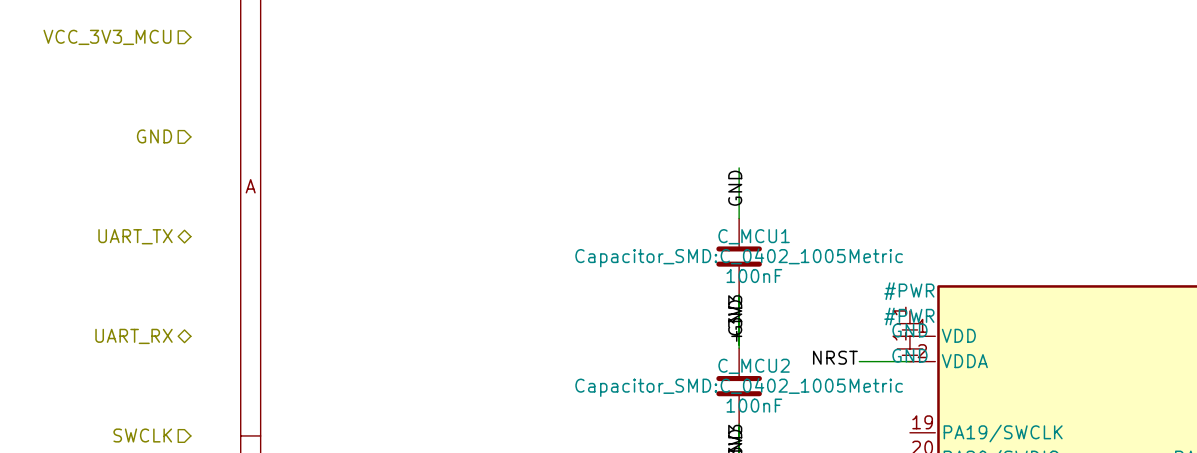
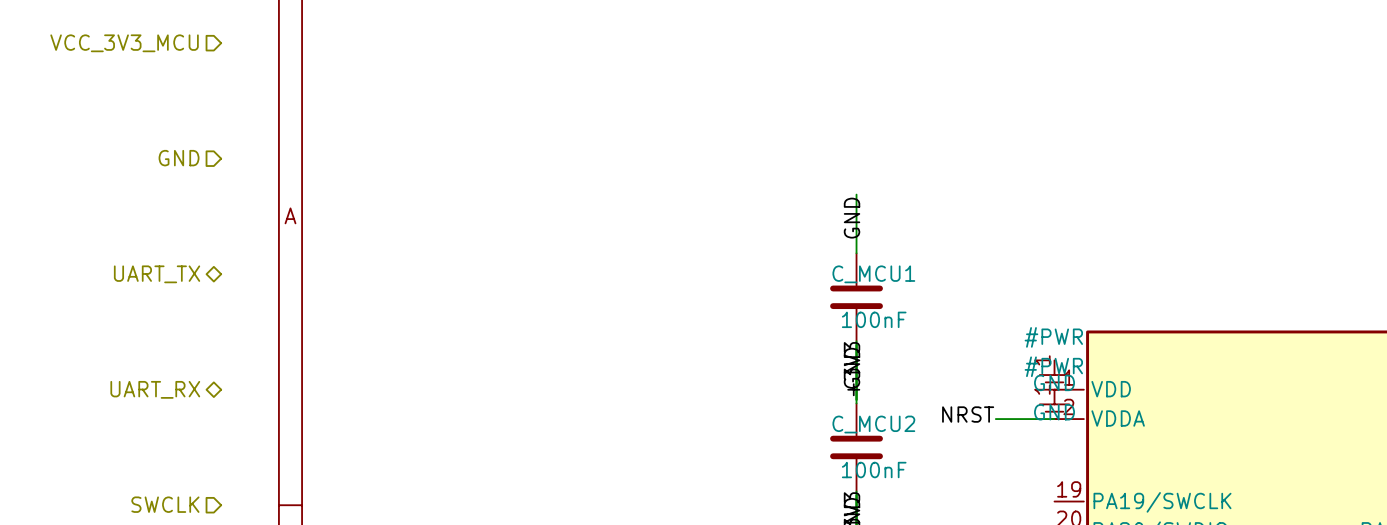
C_MCU1 text: Capacitor_SMD:C_0402_1005Metric (739, 257) -> none
C_MCU2 text: Capacitor_SMD:C_0402_1005Metric (739, 387) -> none

